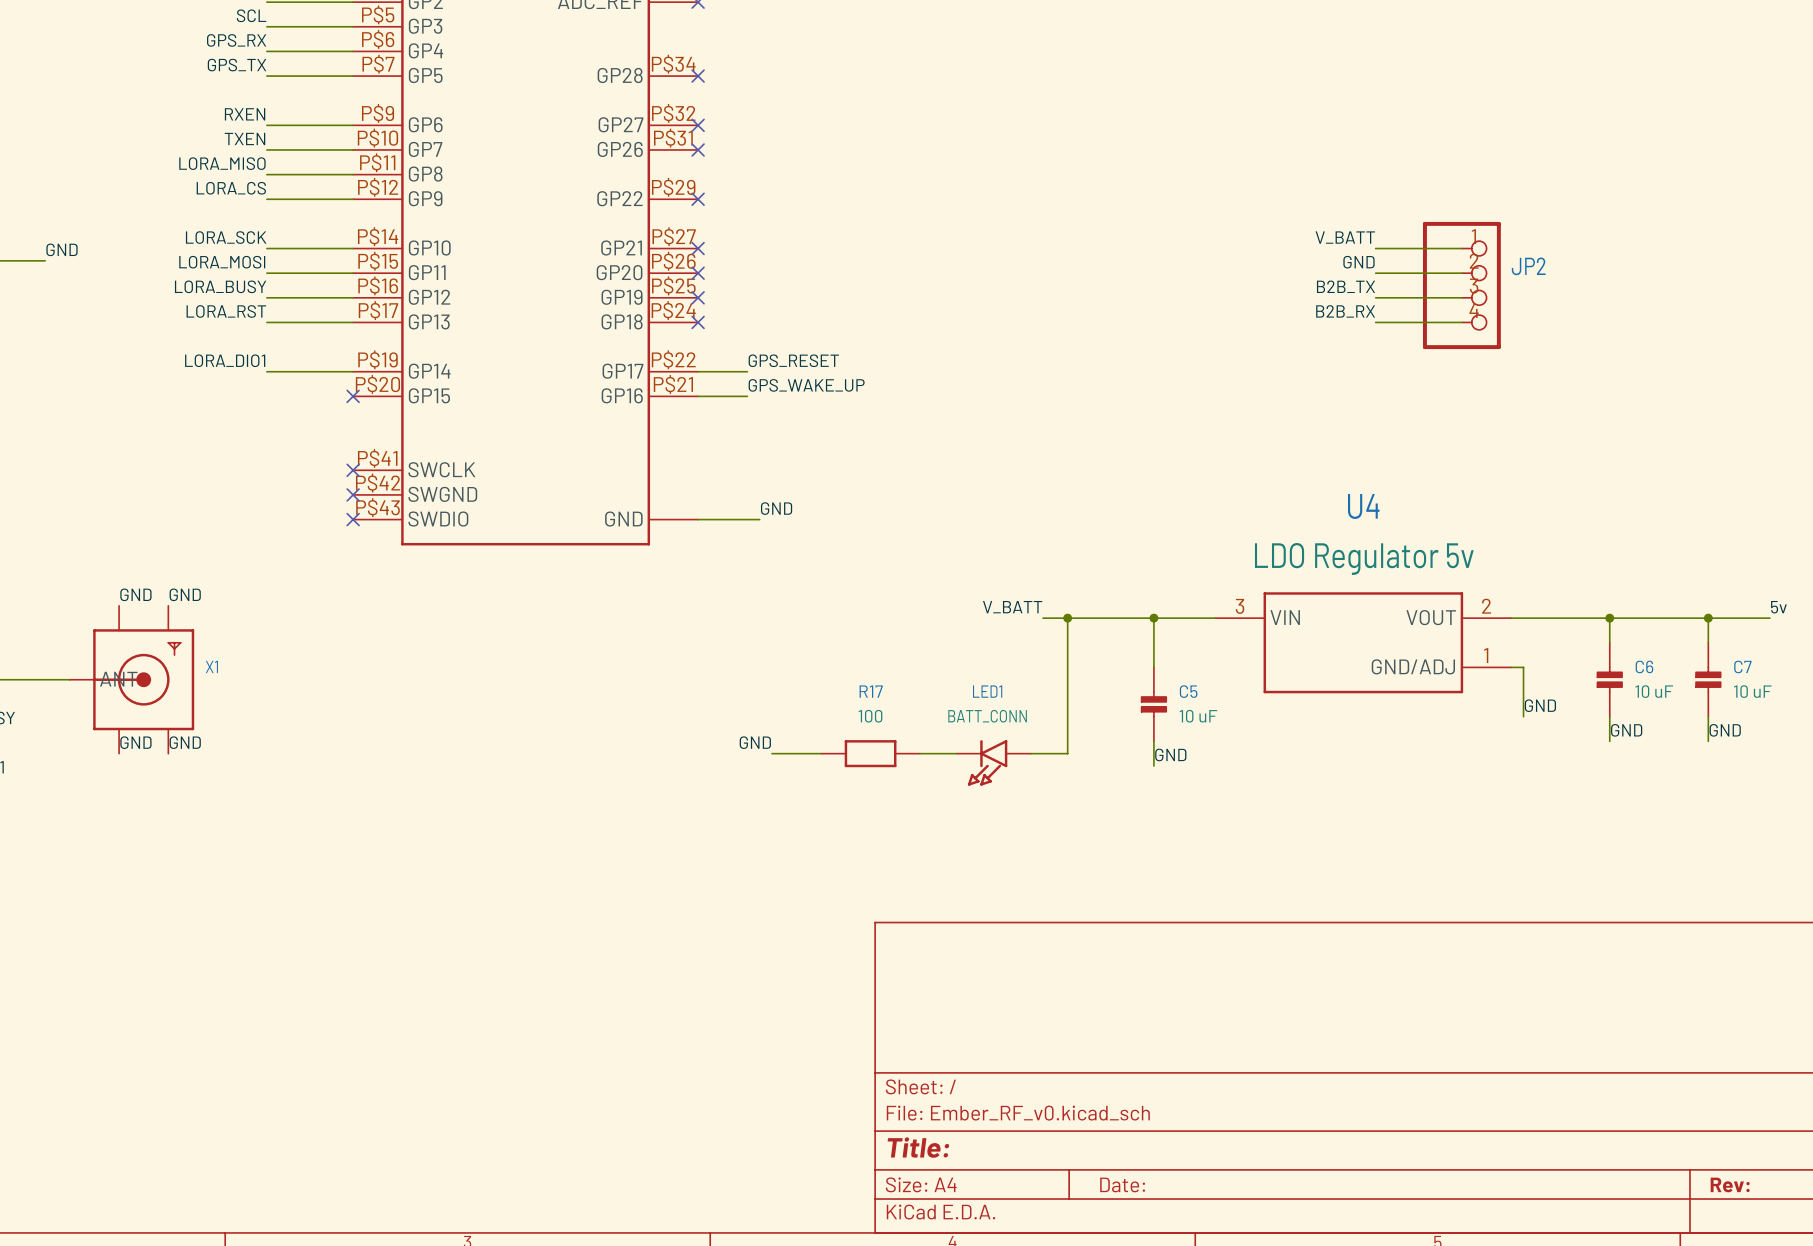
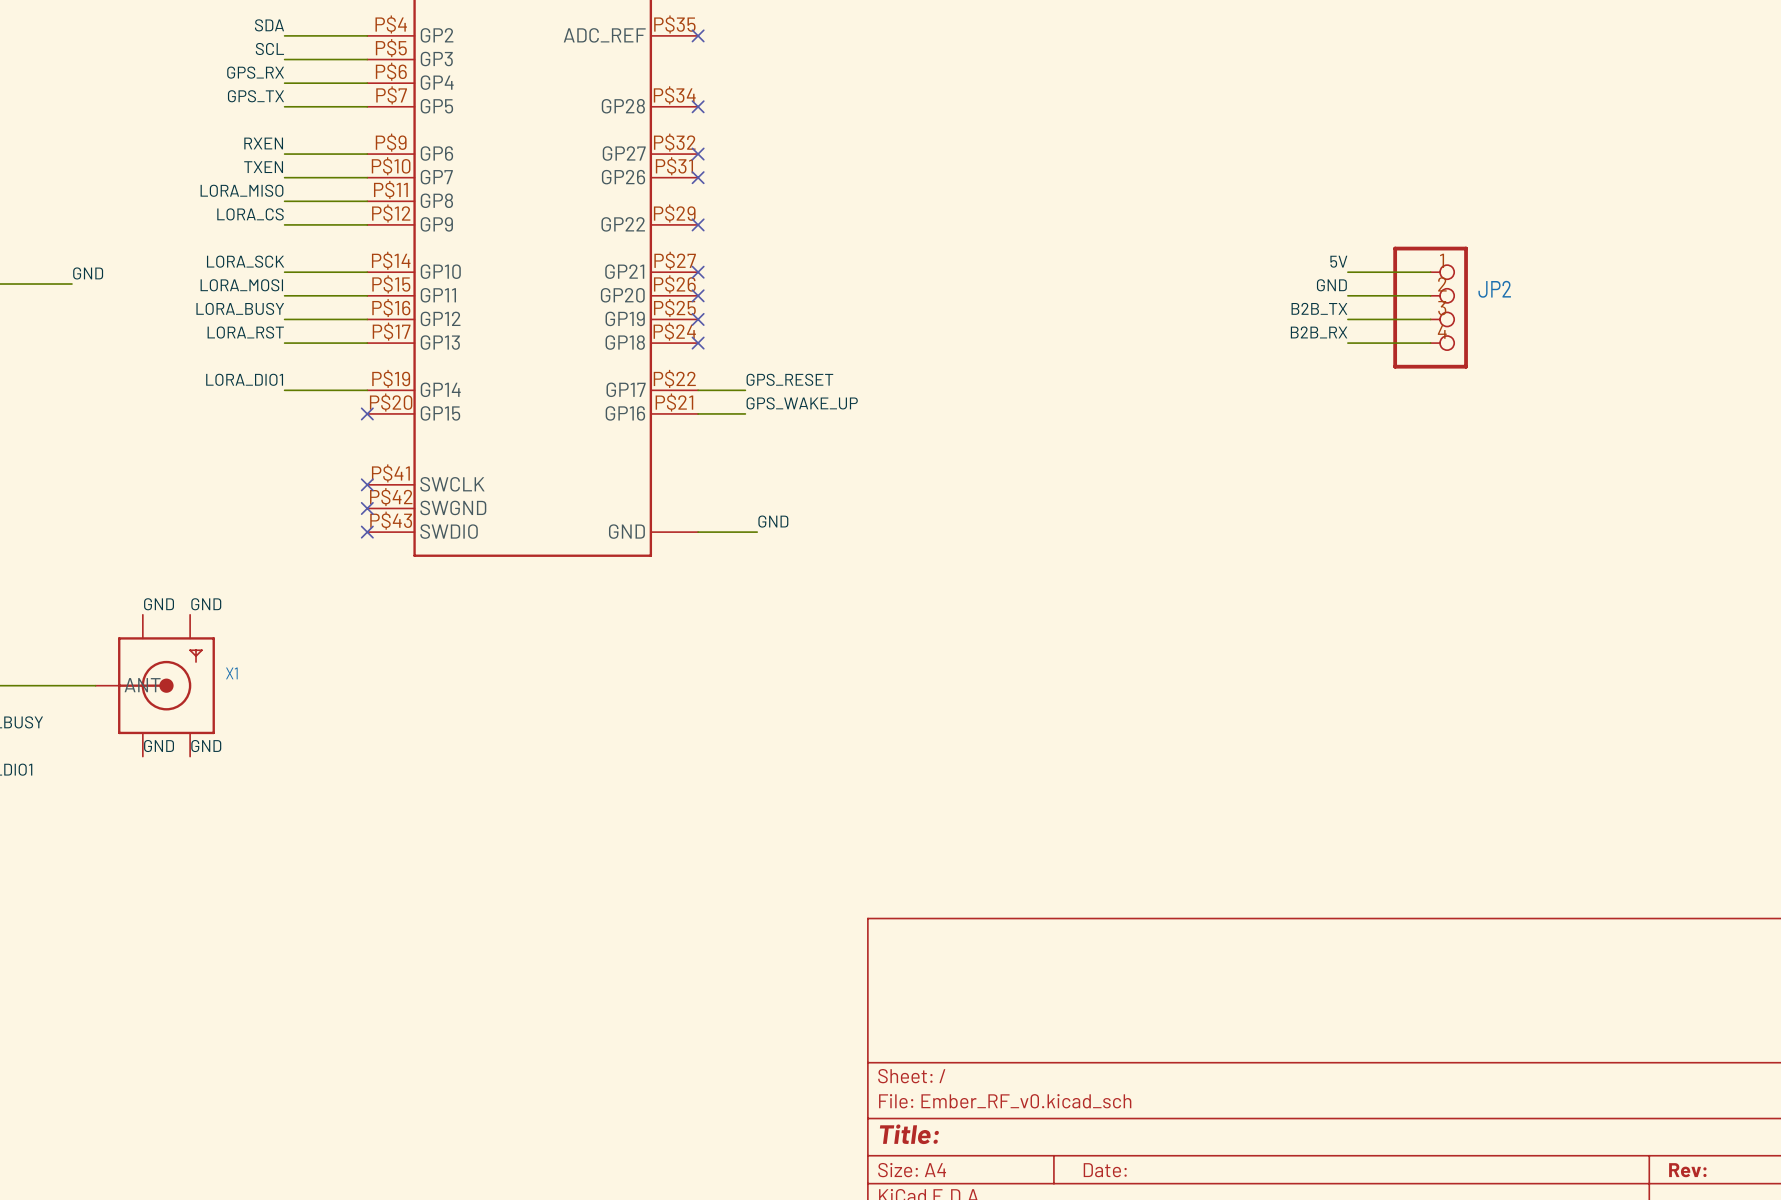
label: V_BATT (1345, 237) -> 5V (1338, 261)
label: V_BATT (1012, 607) -> none
label: 5v (1778, 607) -> none
wire: (1043, 618) (1215, 618) -> none
wire: (1067, 618) (1067, 753) (1030, 753) -> none
junction: (1067, 618) -> none
wire: (1153, 618) (1153, 667) -> none
junction: (1153, 618) -> none
wire: (1511, 618) (1769, 618) -> none
wire: (1609, 618) (1609, 642) -> none
junction: (1609, 618) -> none
wire: (1708, 618) (1708, 642) -> none
junction: (1708, 618) -> none
U4: LDO Regulator 5v (1363, 642) -> none
wire: (1511, 667) (1523, 667) (1523, 716) -> none
C6: 10 uF (1609, 679) -> none
C7: 10 uF (1708, 679) -> none
C5: 10 uF (1153, 704) -> none
label: GND (1540, 705) -> none
wire: (1609, 716) (1609, 741) -> none
wire: (1708, 716) (1708, 741) -> none
label: GND (1626, 730) -> none
label: GND (1725, 730) -> none
wire: (1153, 741) (1153, 765) -> none
label: GND (755, 742) -> none
wire: (772, 753) (821, 753) -> none
R17: 100 (870, 753) -> none
wire: (919, 753) (956, 753) -> none
label: GND (1170, 754) -> none
LED1: BATT_CONN (993, 762) -> none

